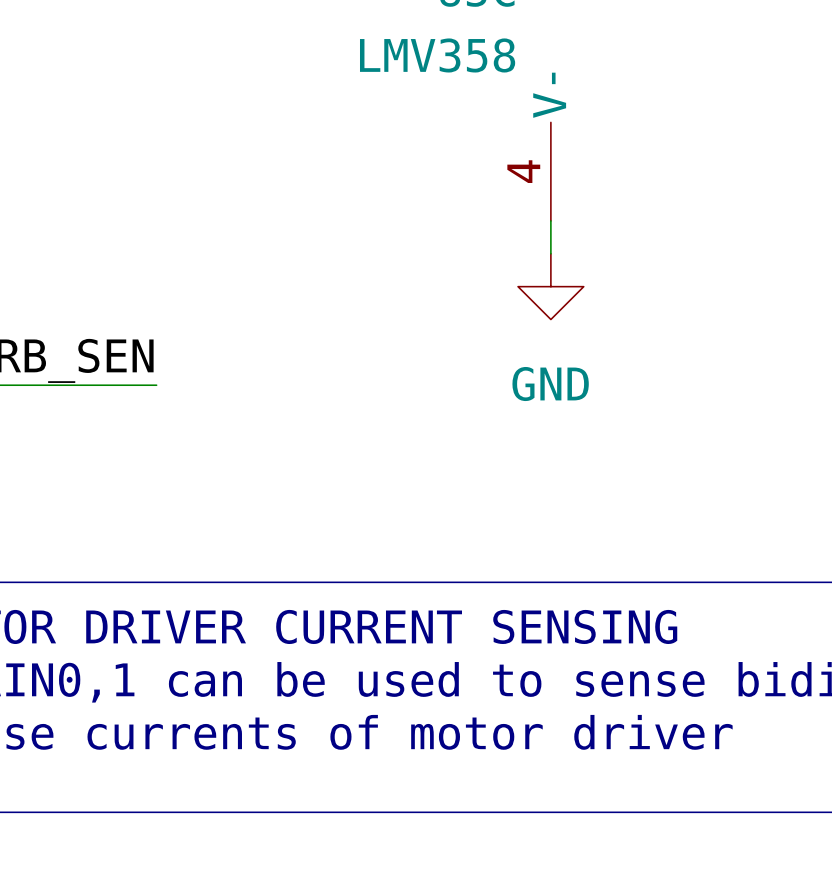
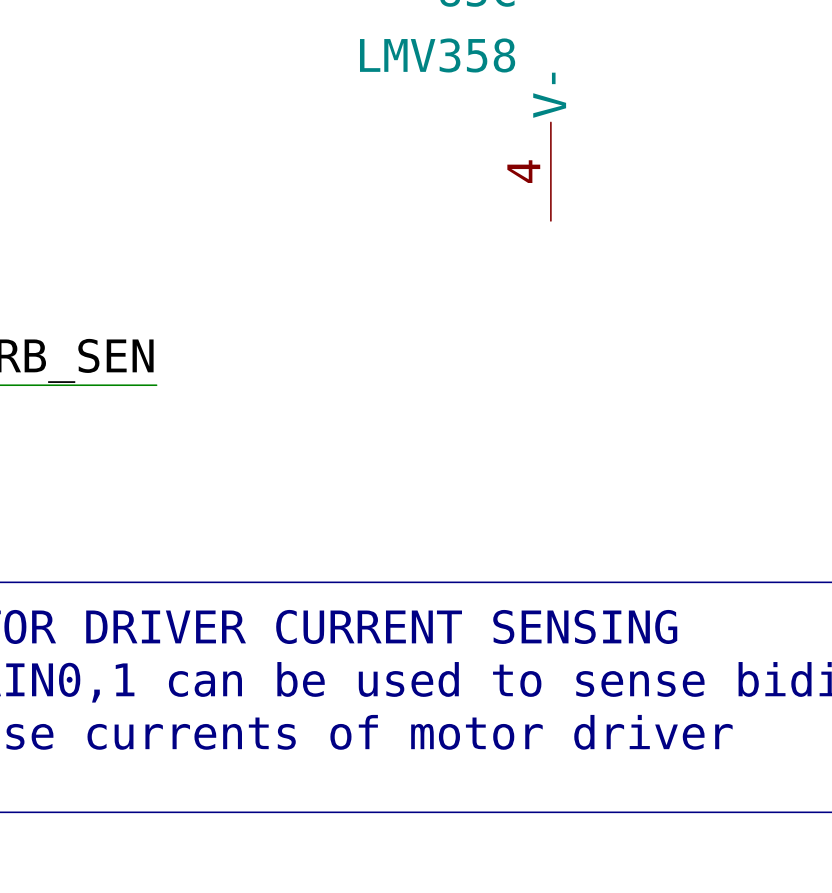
wire: (550, 220) (550, 253) -> none
power symbol: GND (550, 286) -> none

